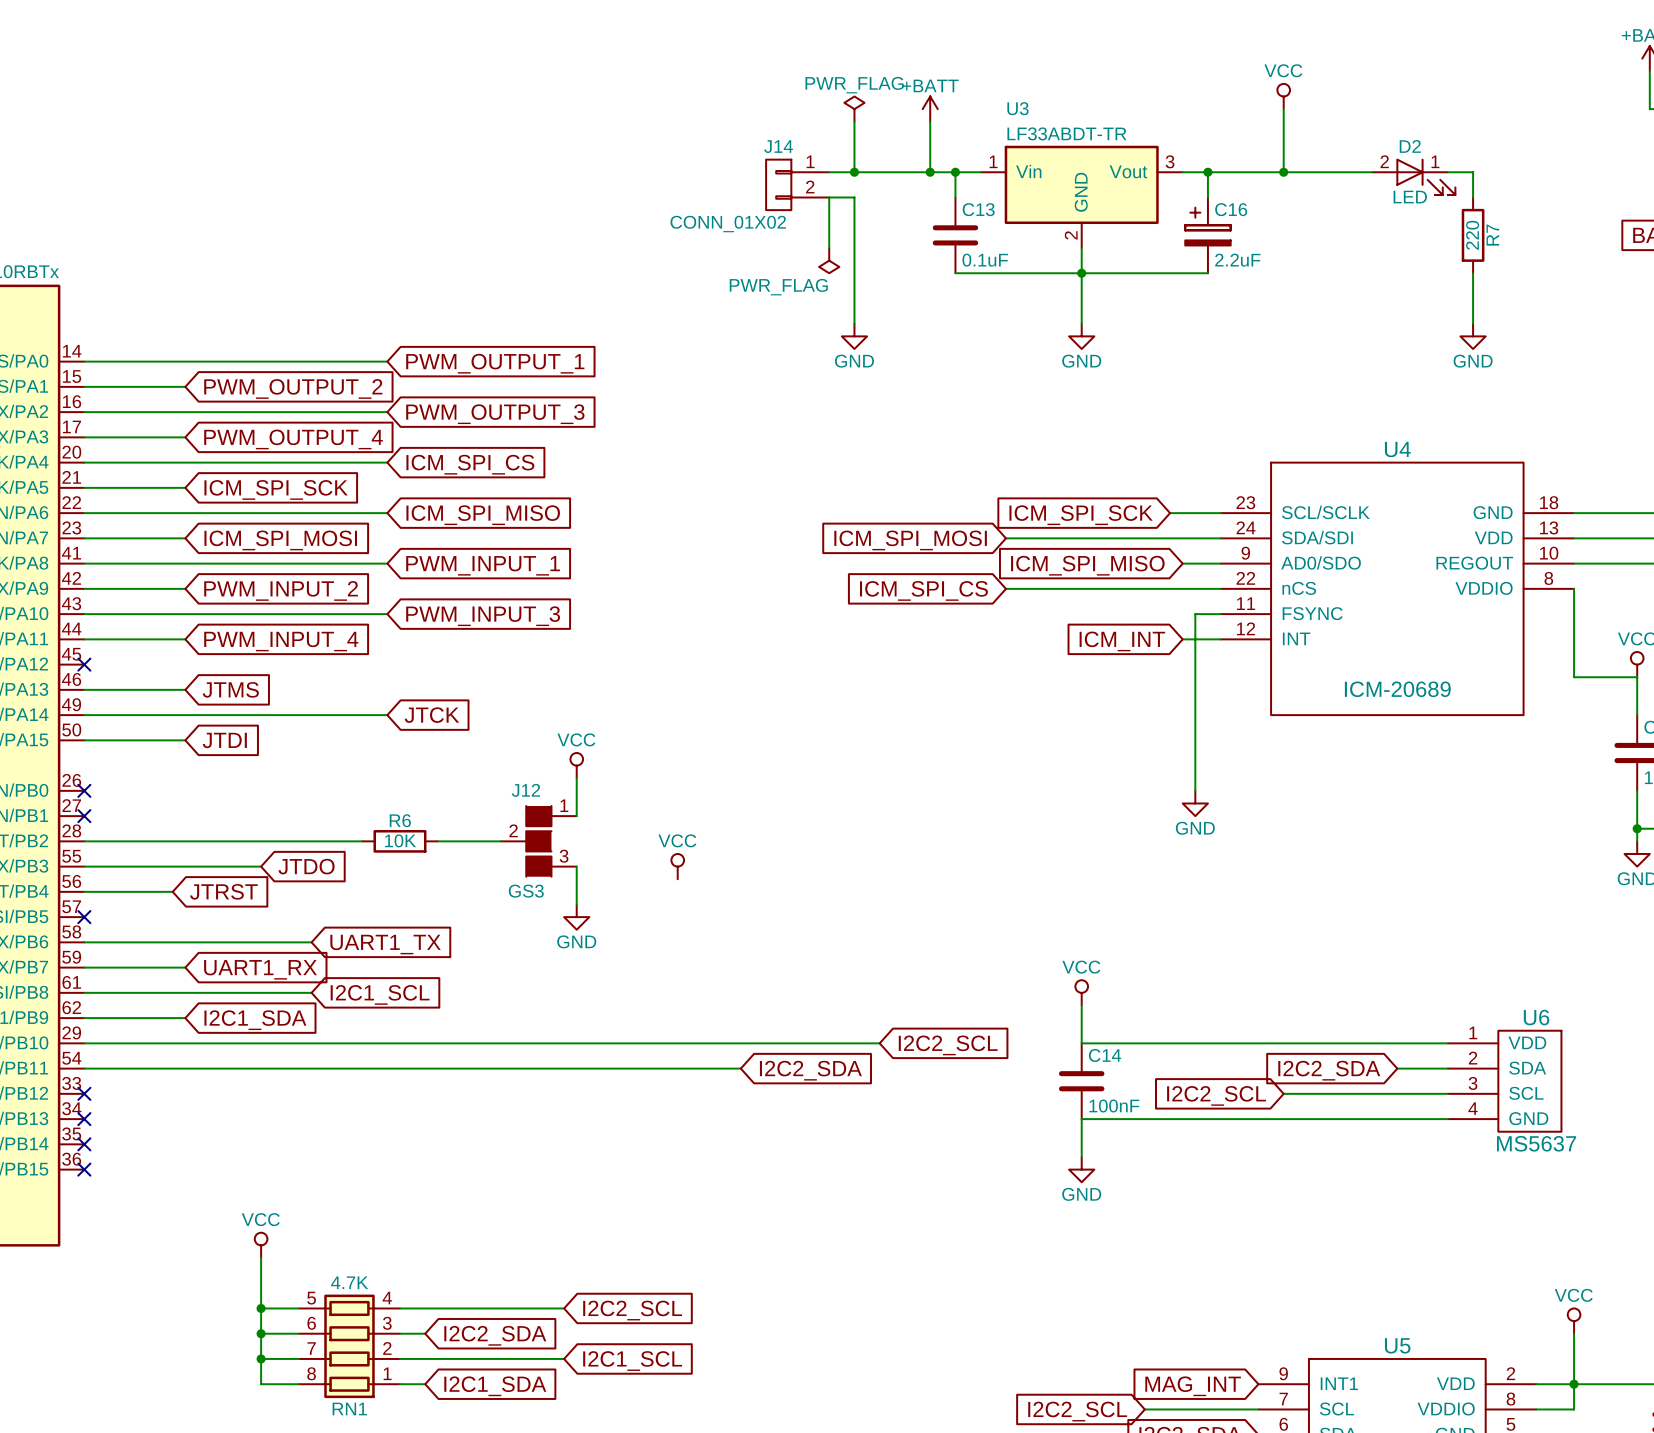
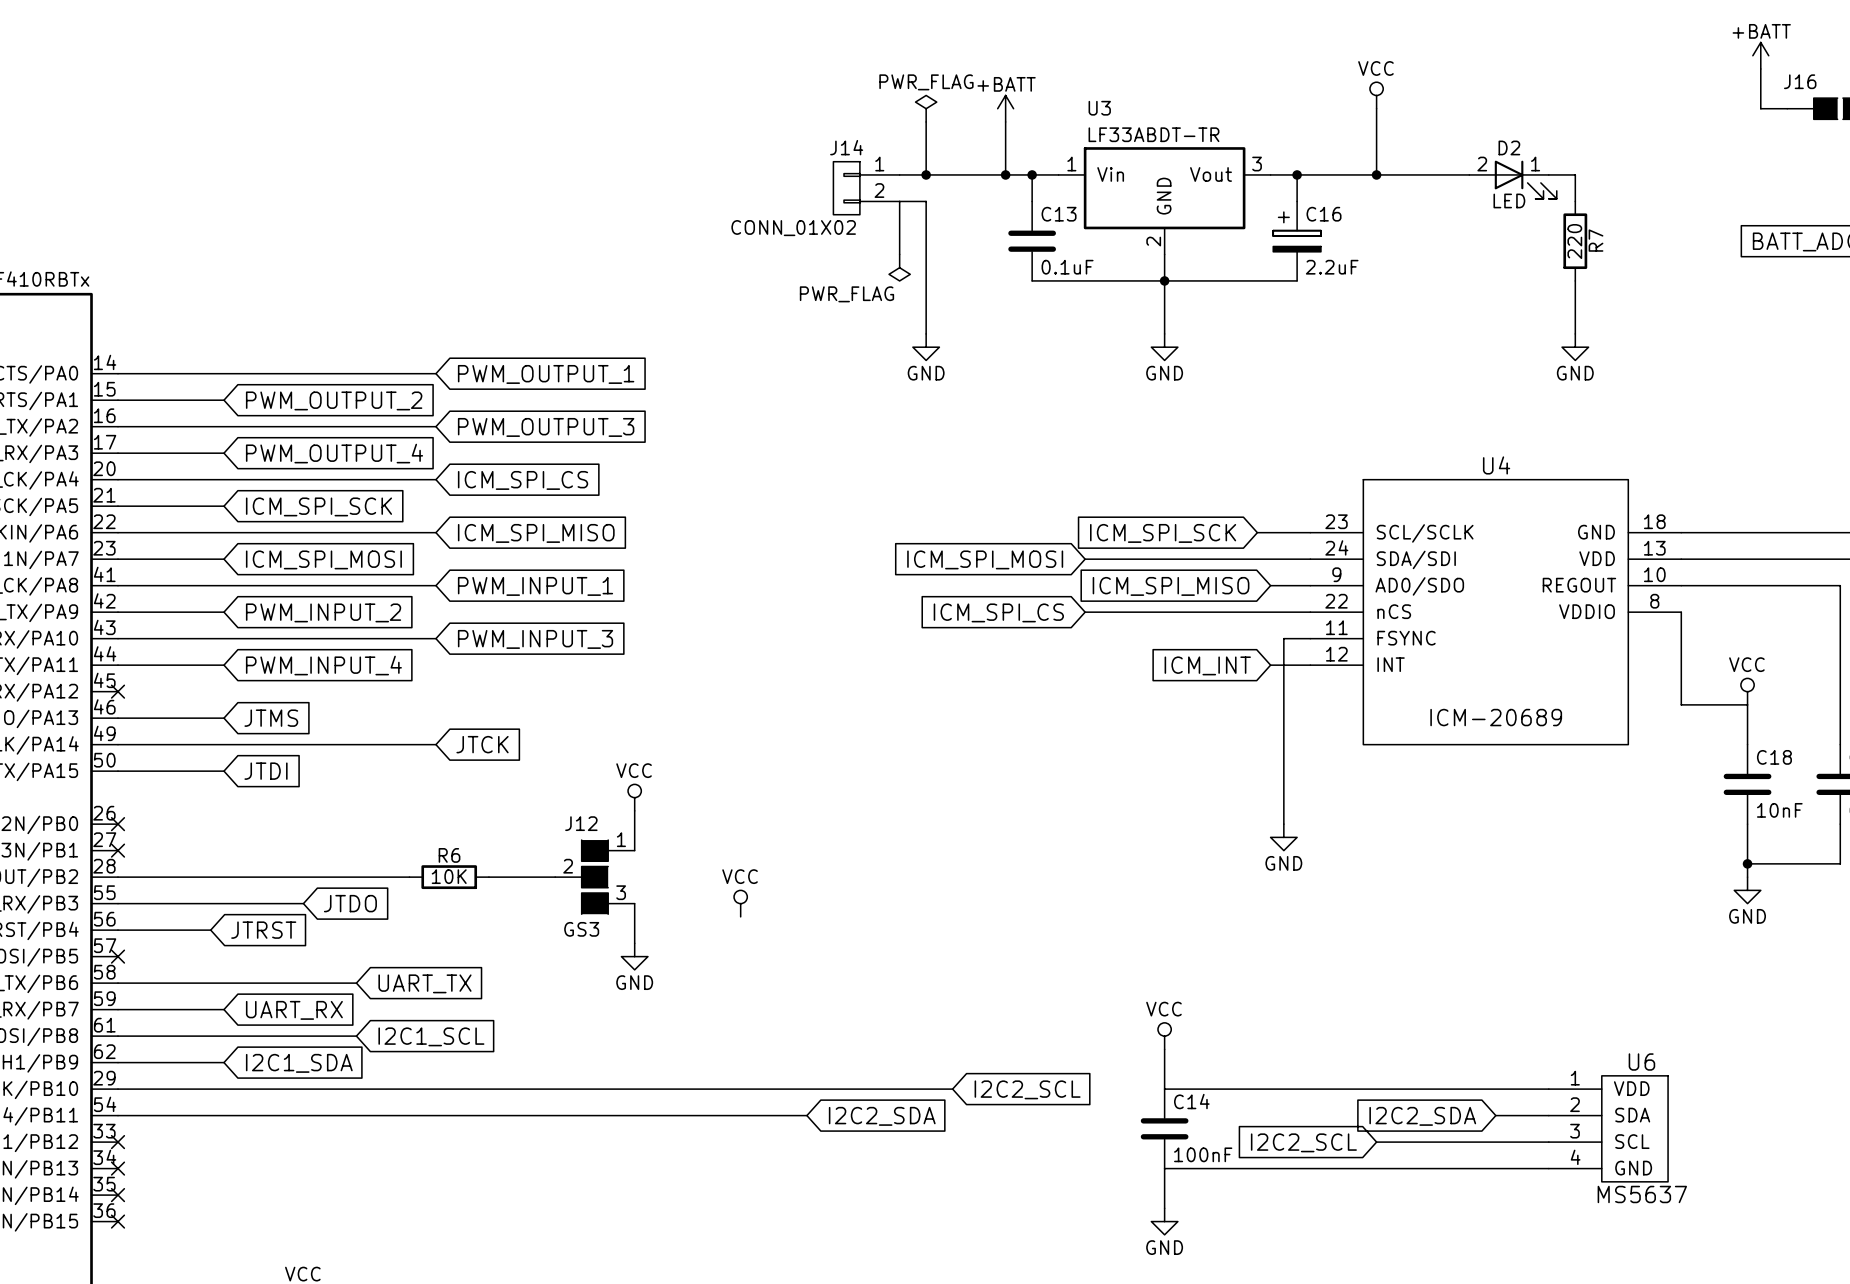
global label: UART1_TX (385, 944) -> UART_TX (424, 983)
global label: UART1_RX (260, 969) -> UART_RX (294, 1010)

